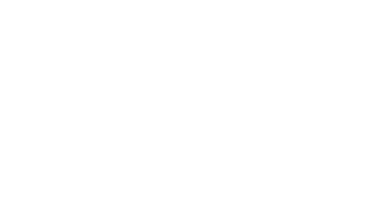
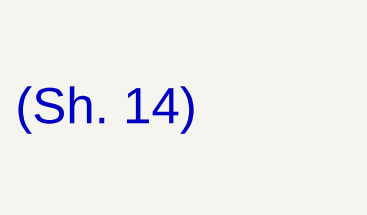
text: none -> (Sh. 14) (106, 110)

